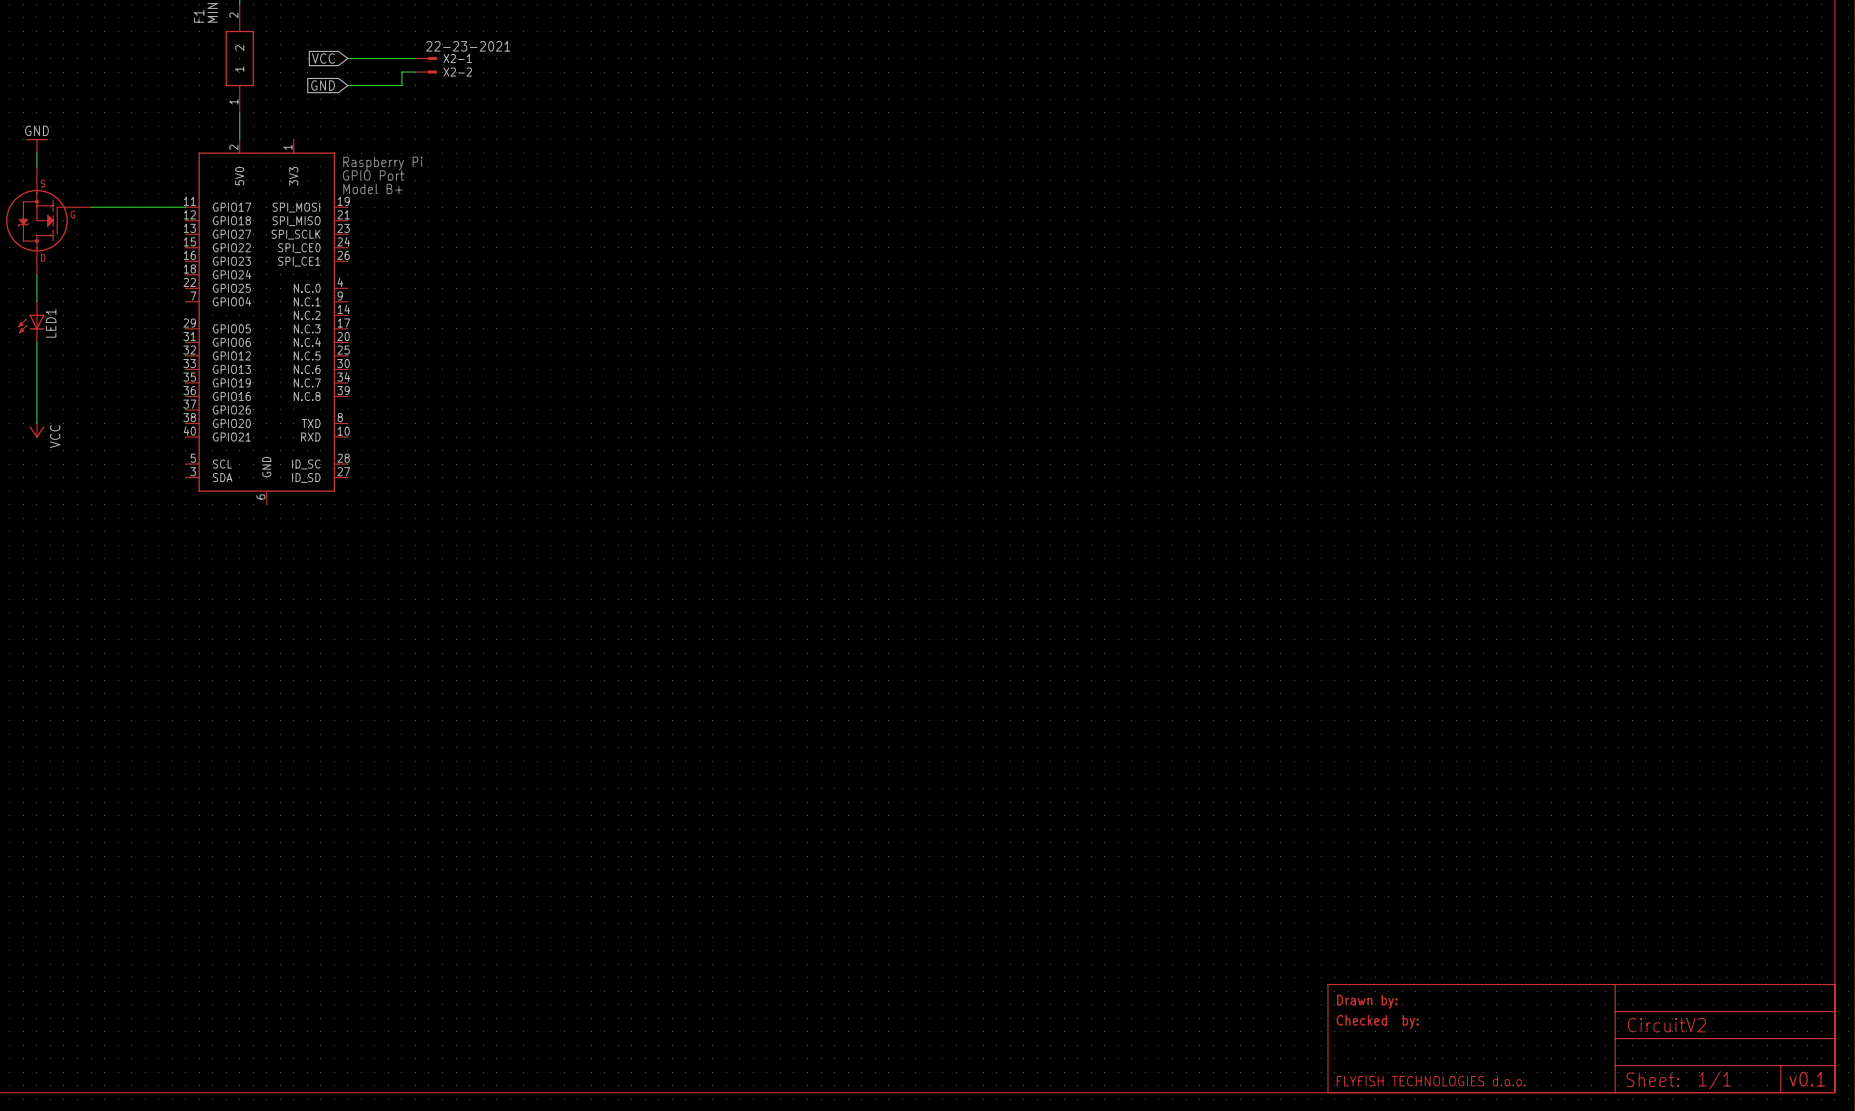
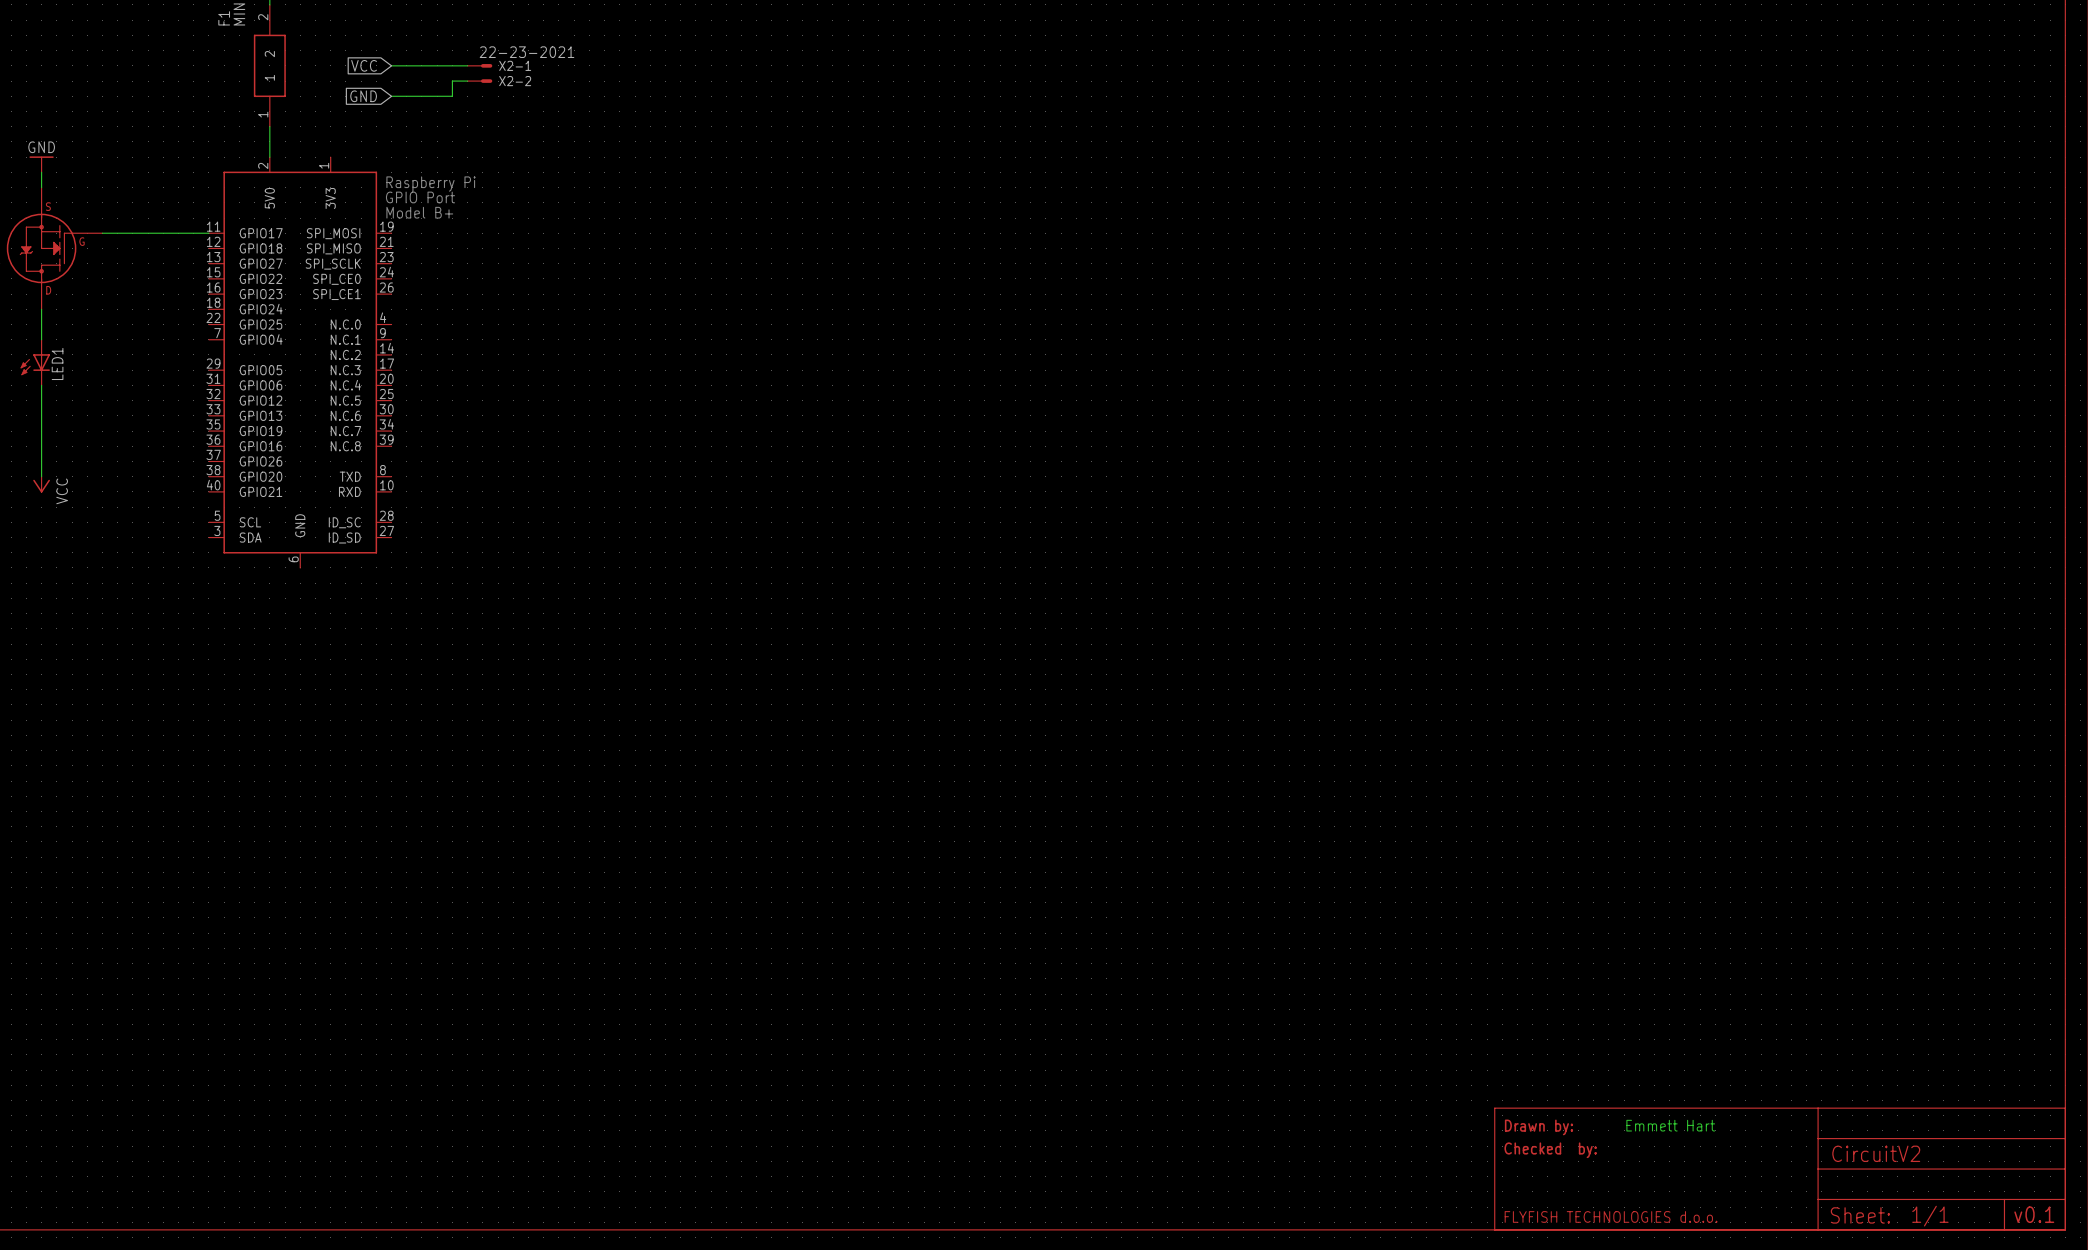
text: none -> Emmett Hart (1670, 1125)

